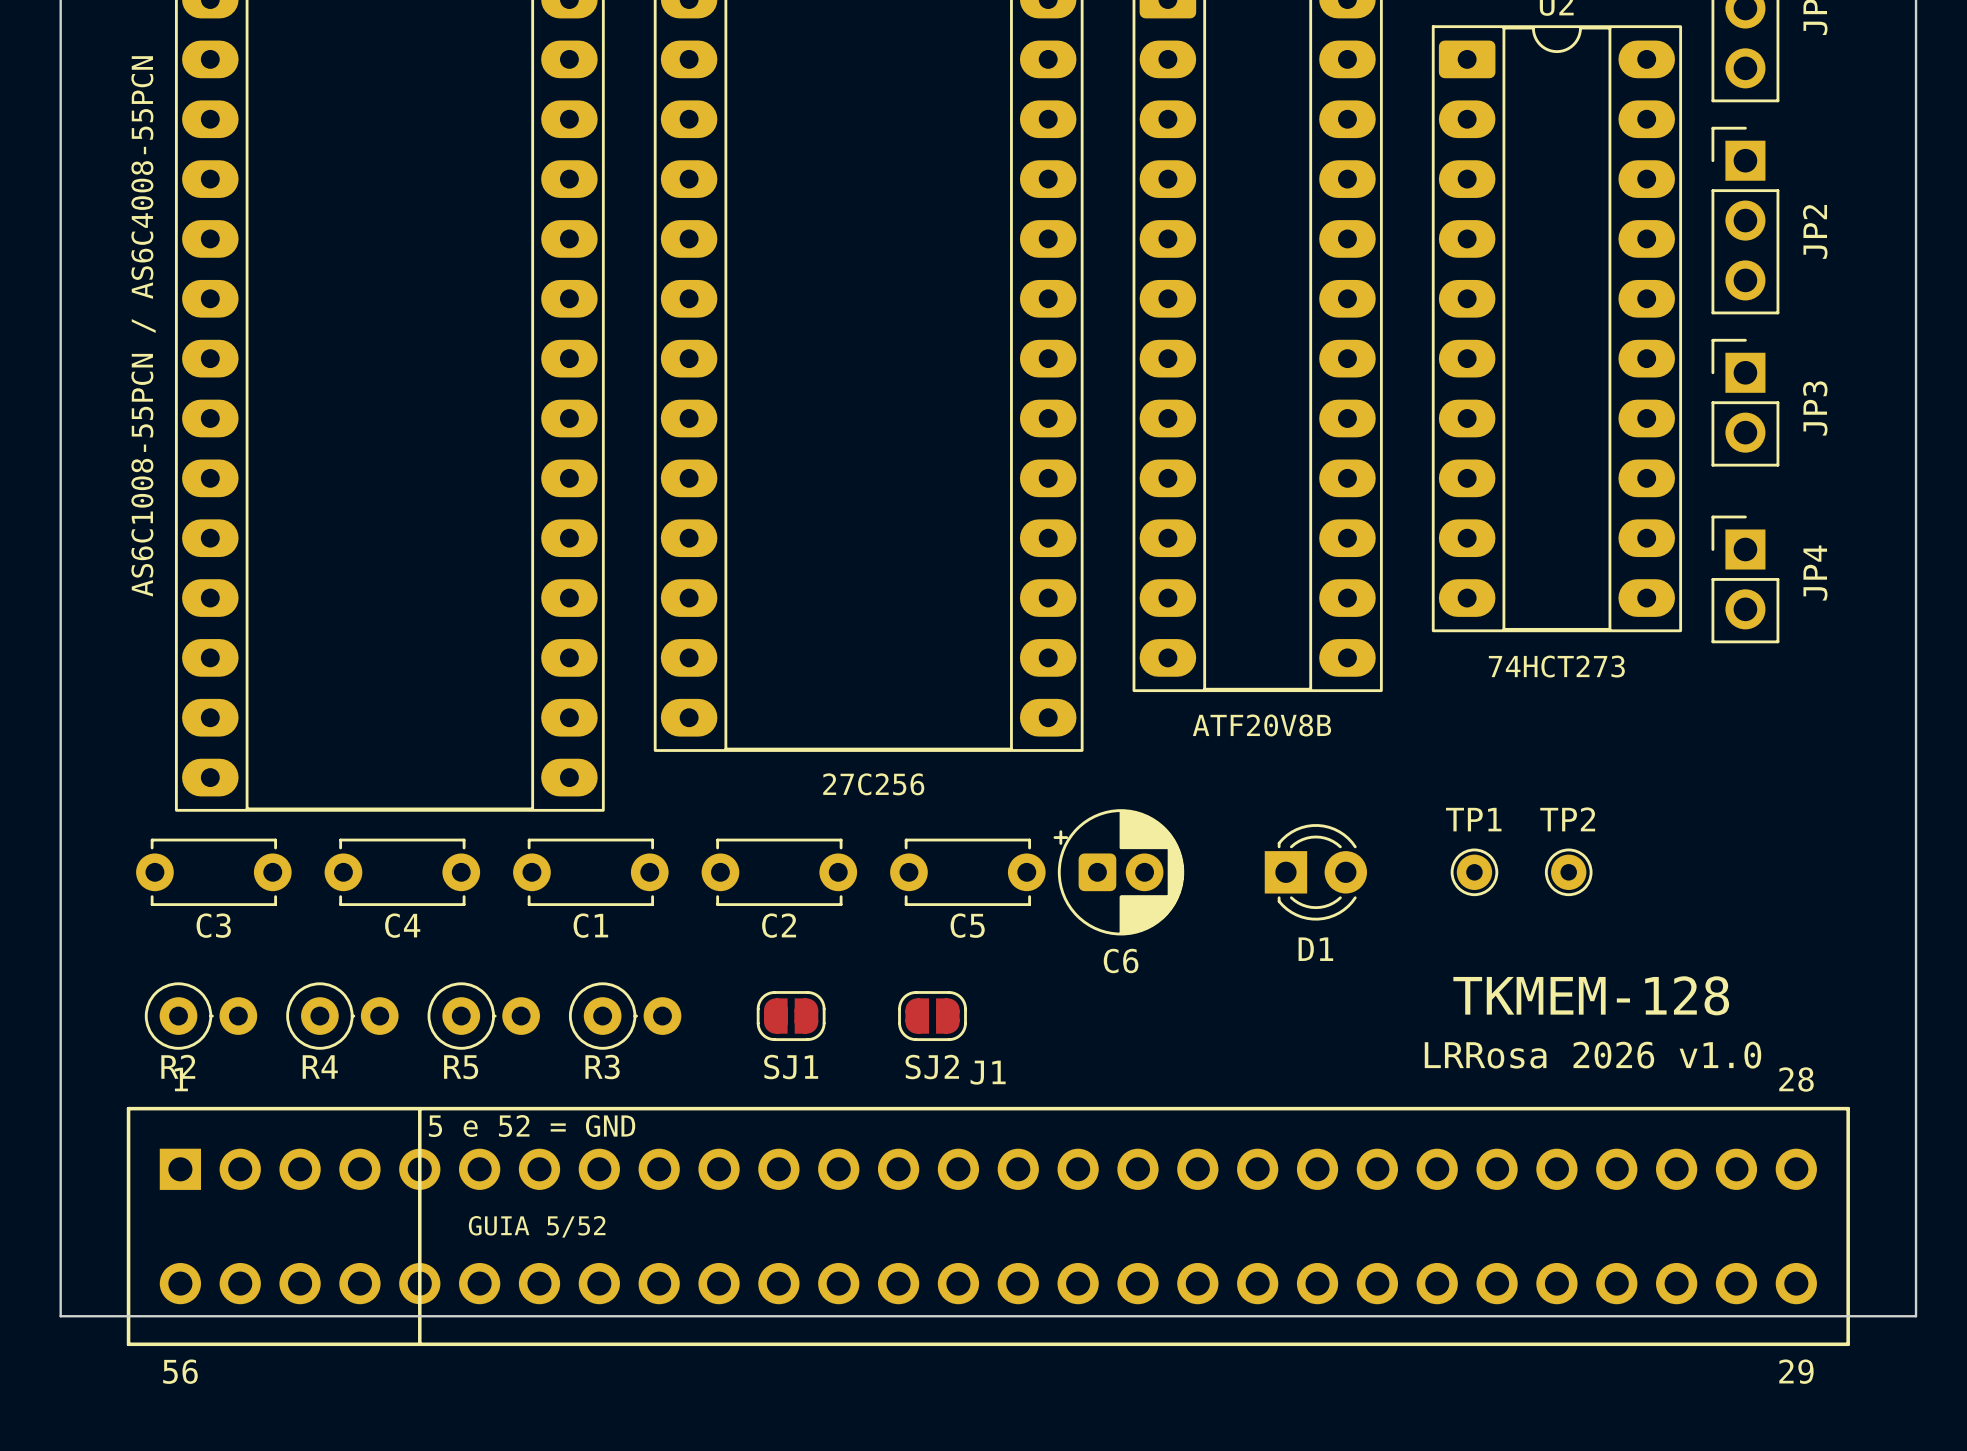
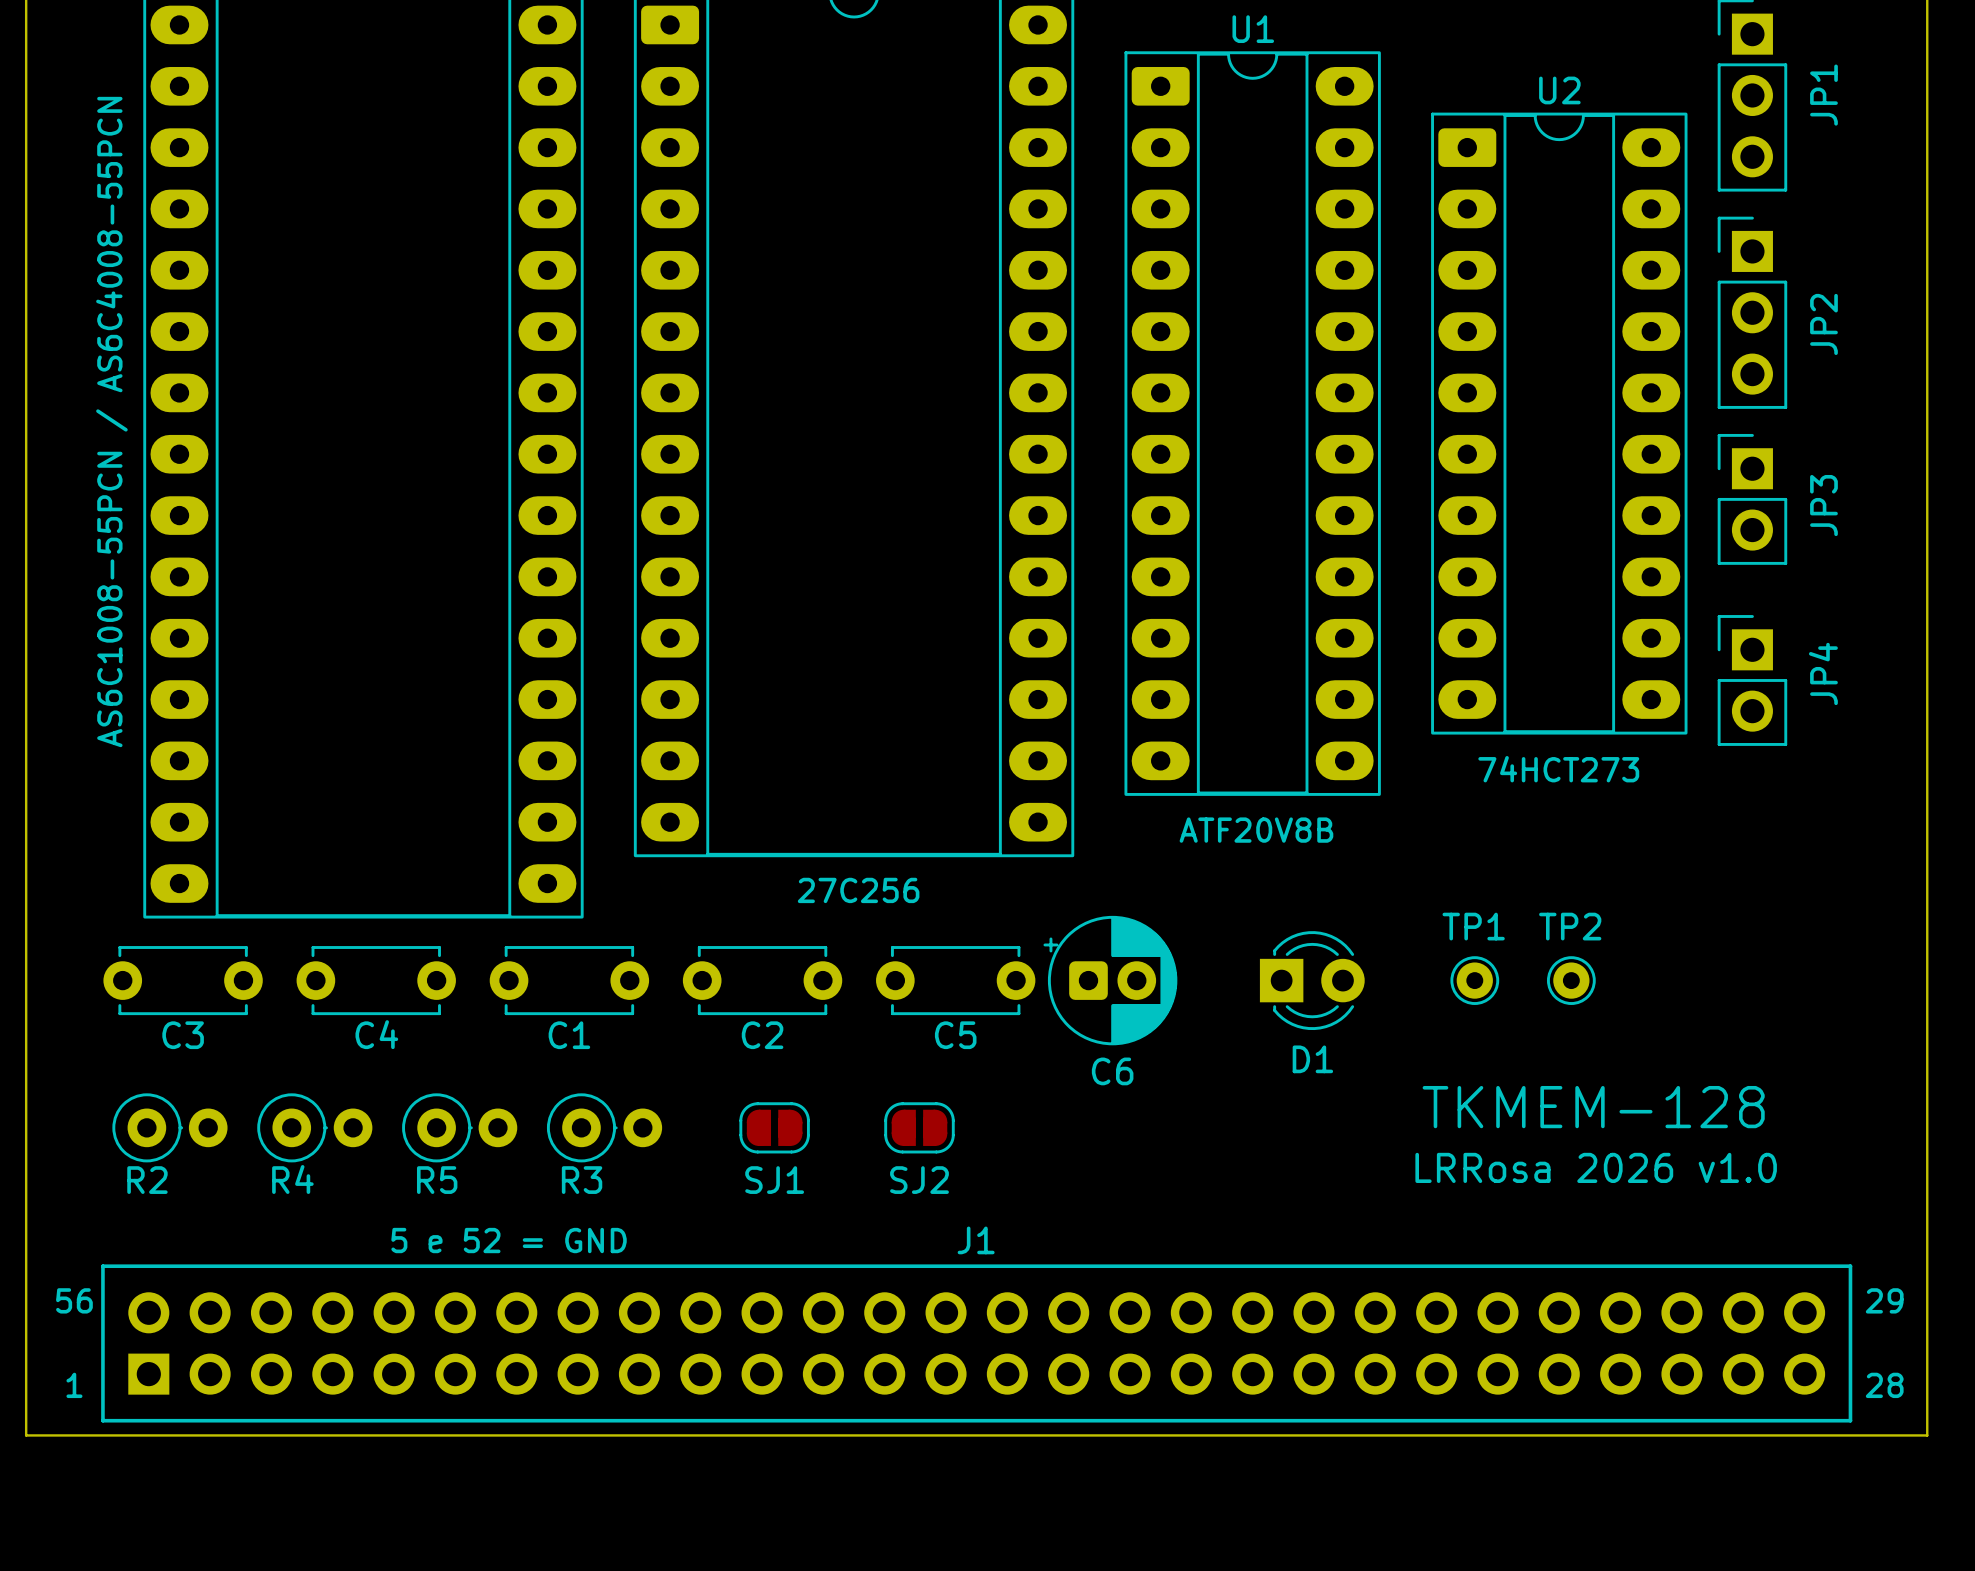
J1 name position: J1 (988, 1072) -> J1 (976, 1240)
J1 footprint: [126, 1106, 1850, 1347] -> [101, 1264, 1853, 1423]

